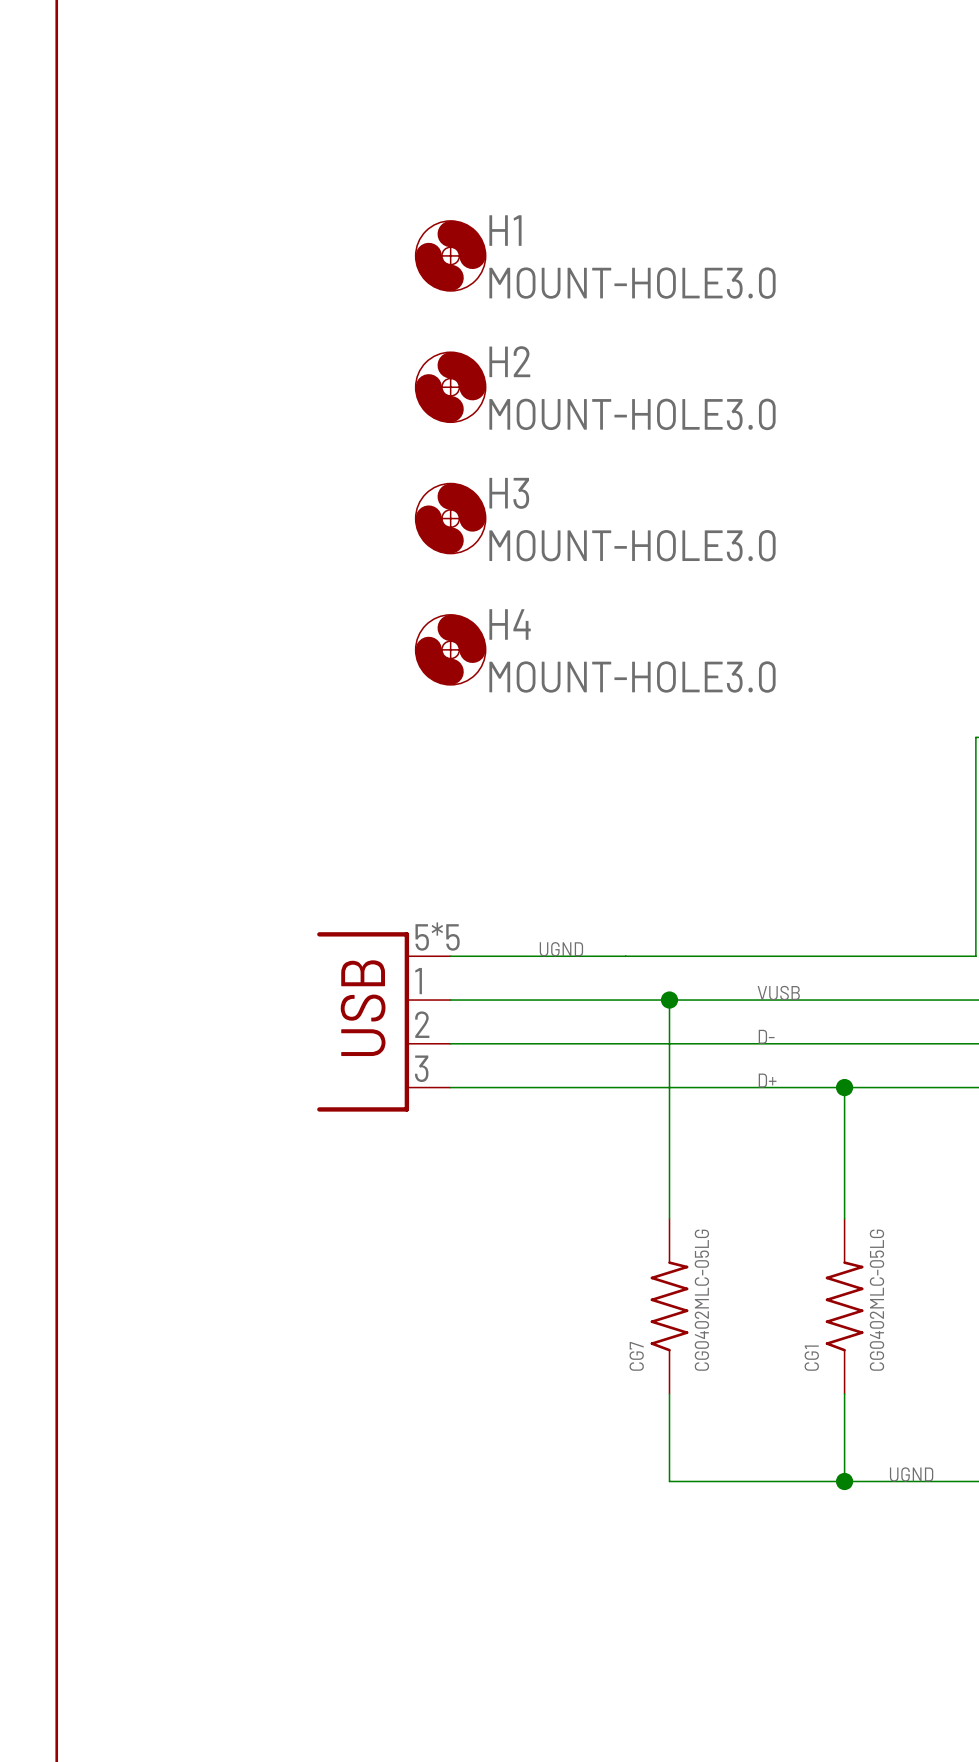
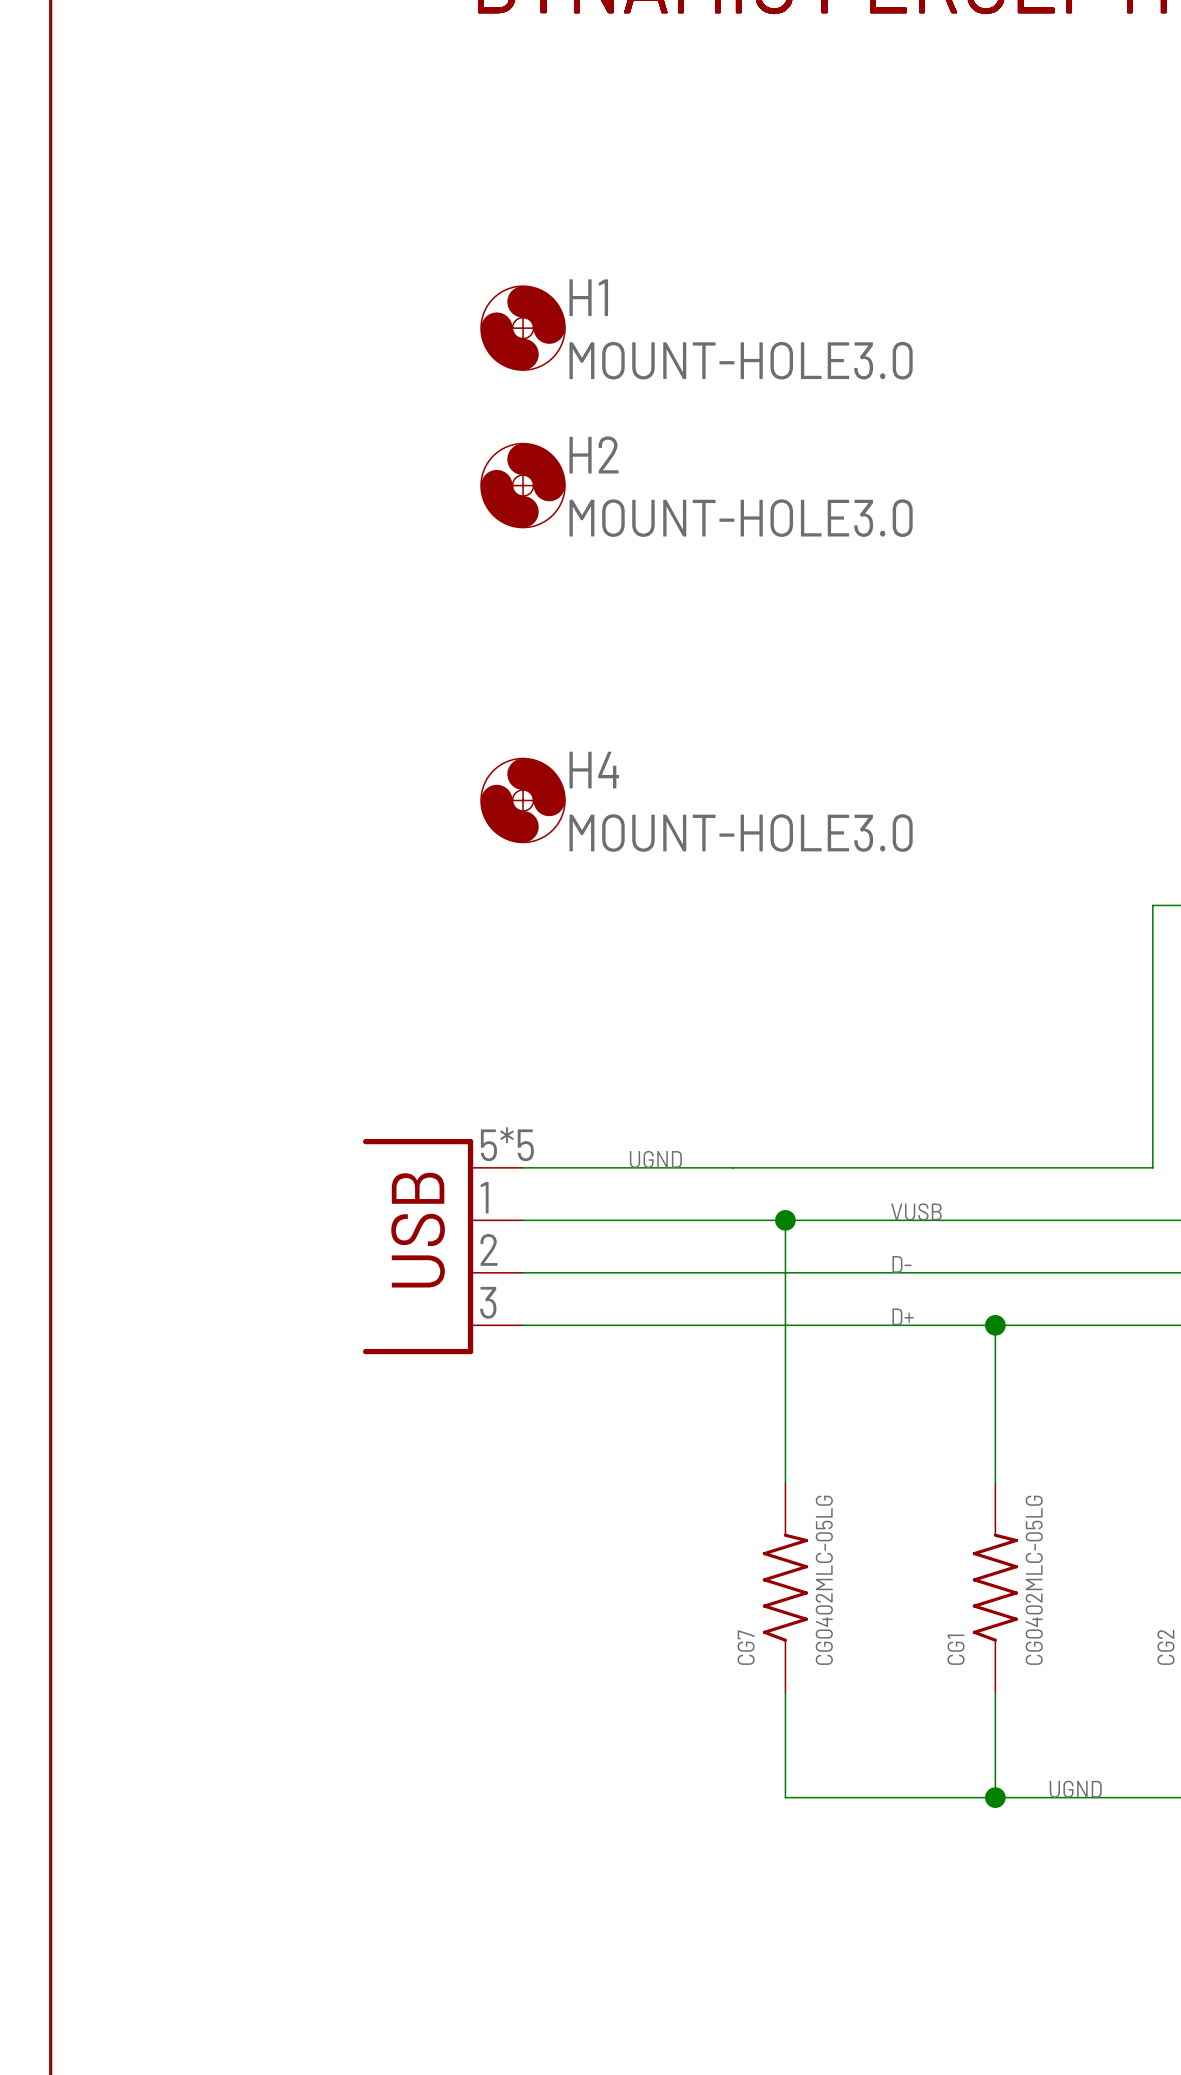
H3: MOUNT-HOLE3.0 (450, 518) -> none

